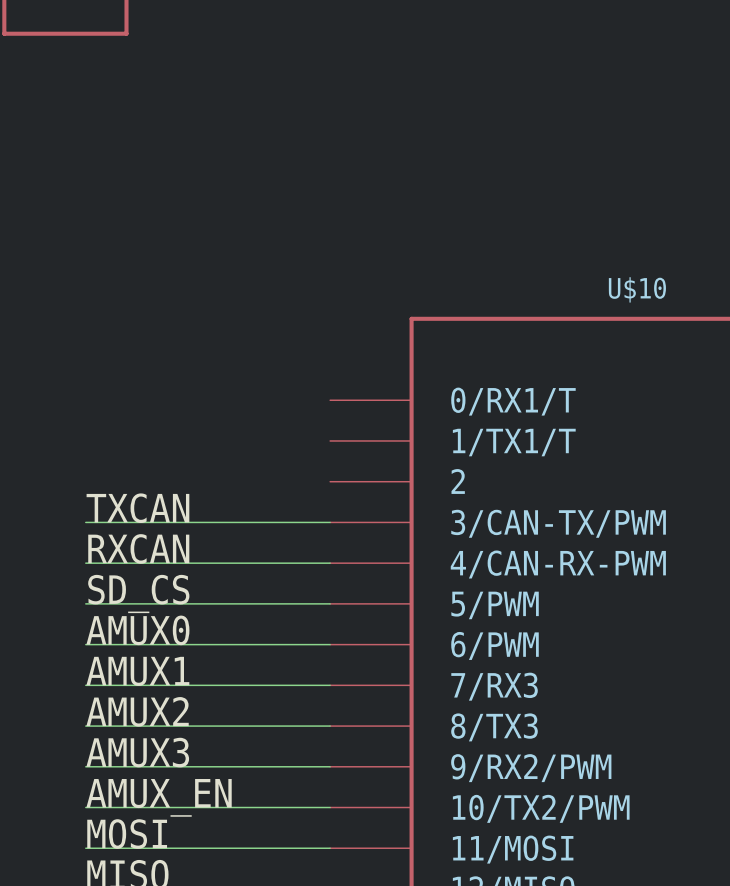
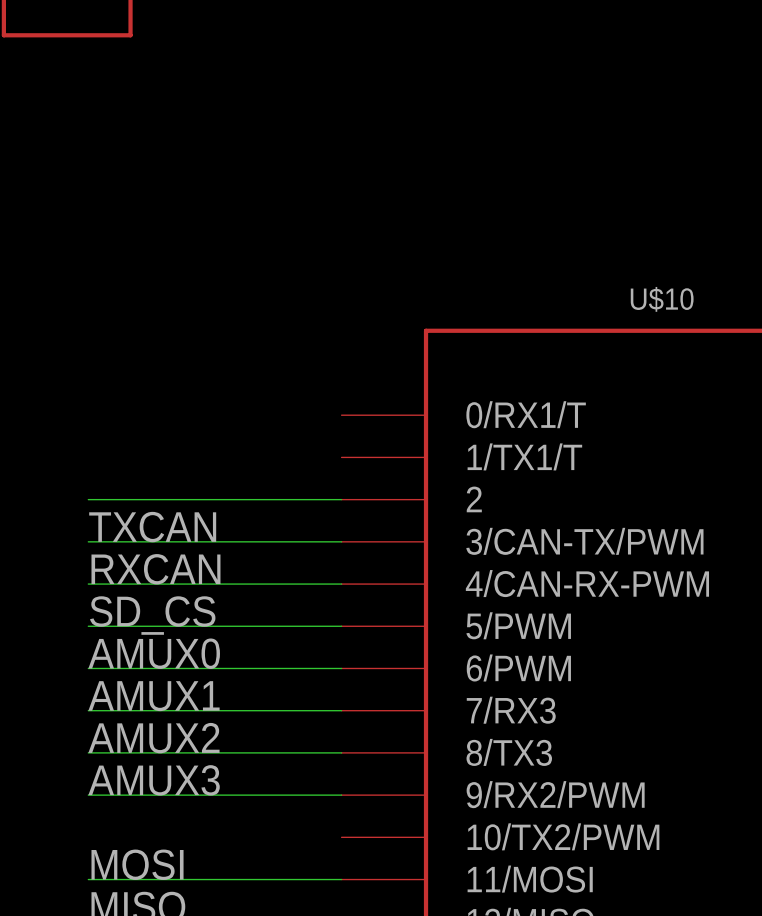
label: AMUX_EN (159, 797) -> none
wire: (85, 807) (330, 807) -> (88, 499) (341, 499)

